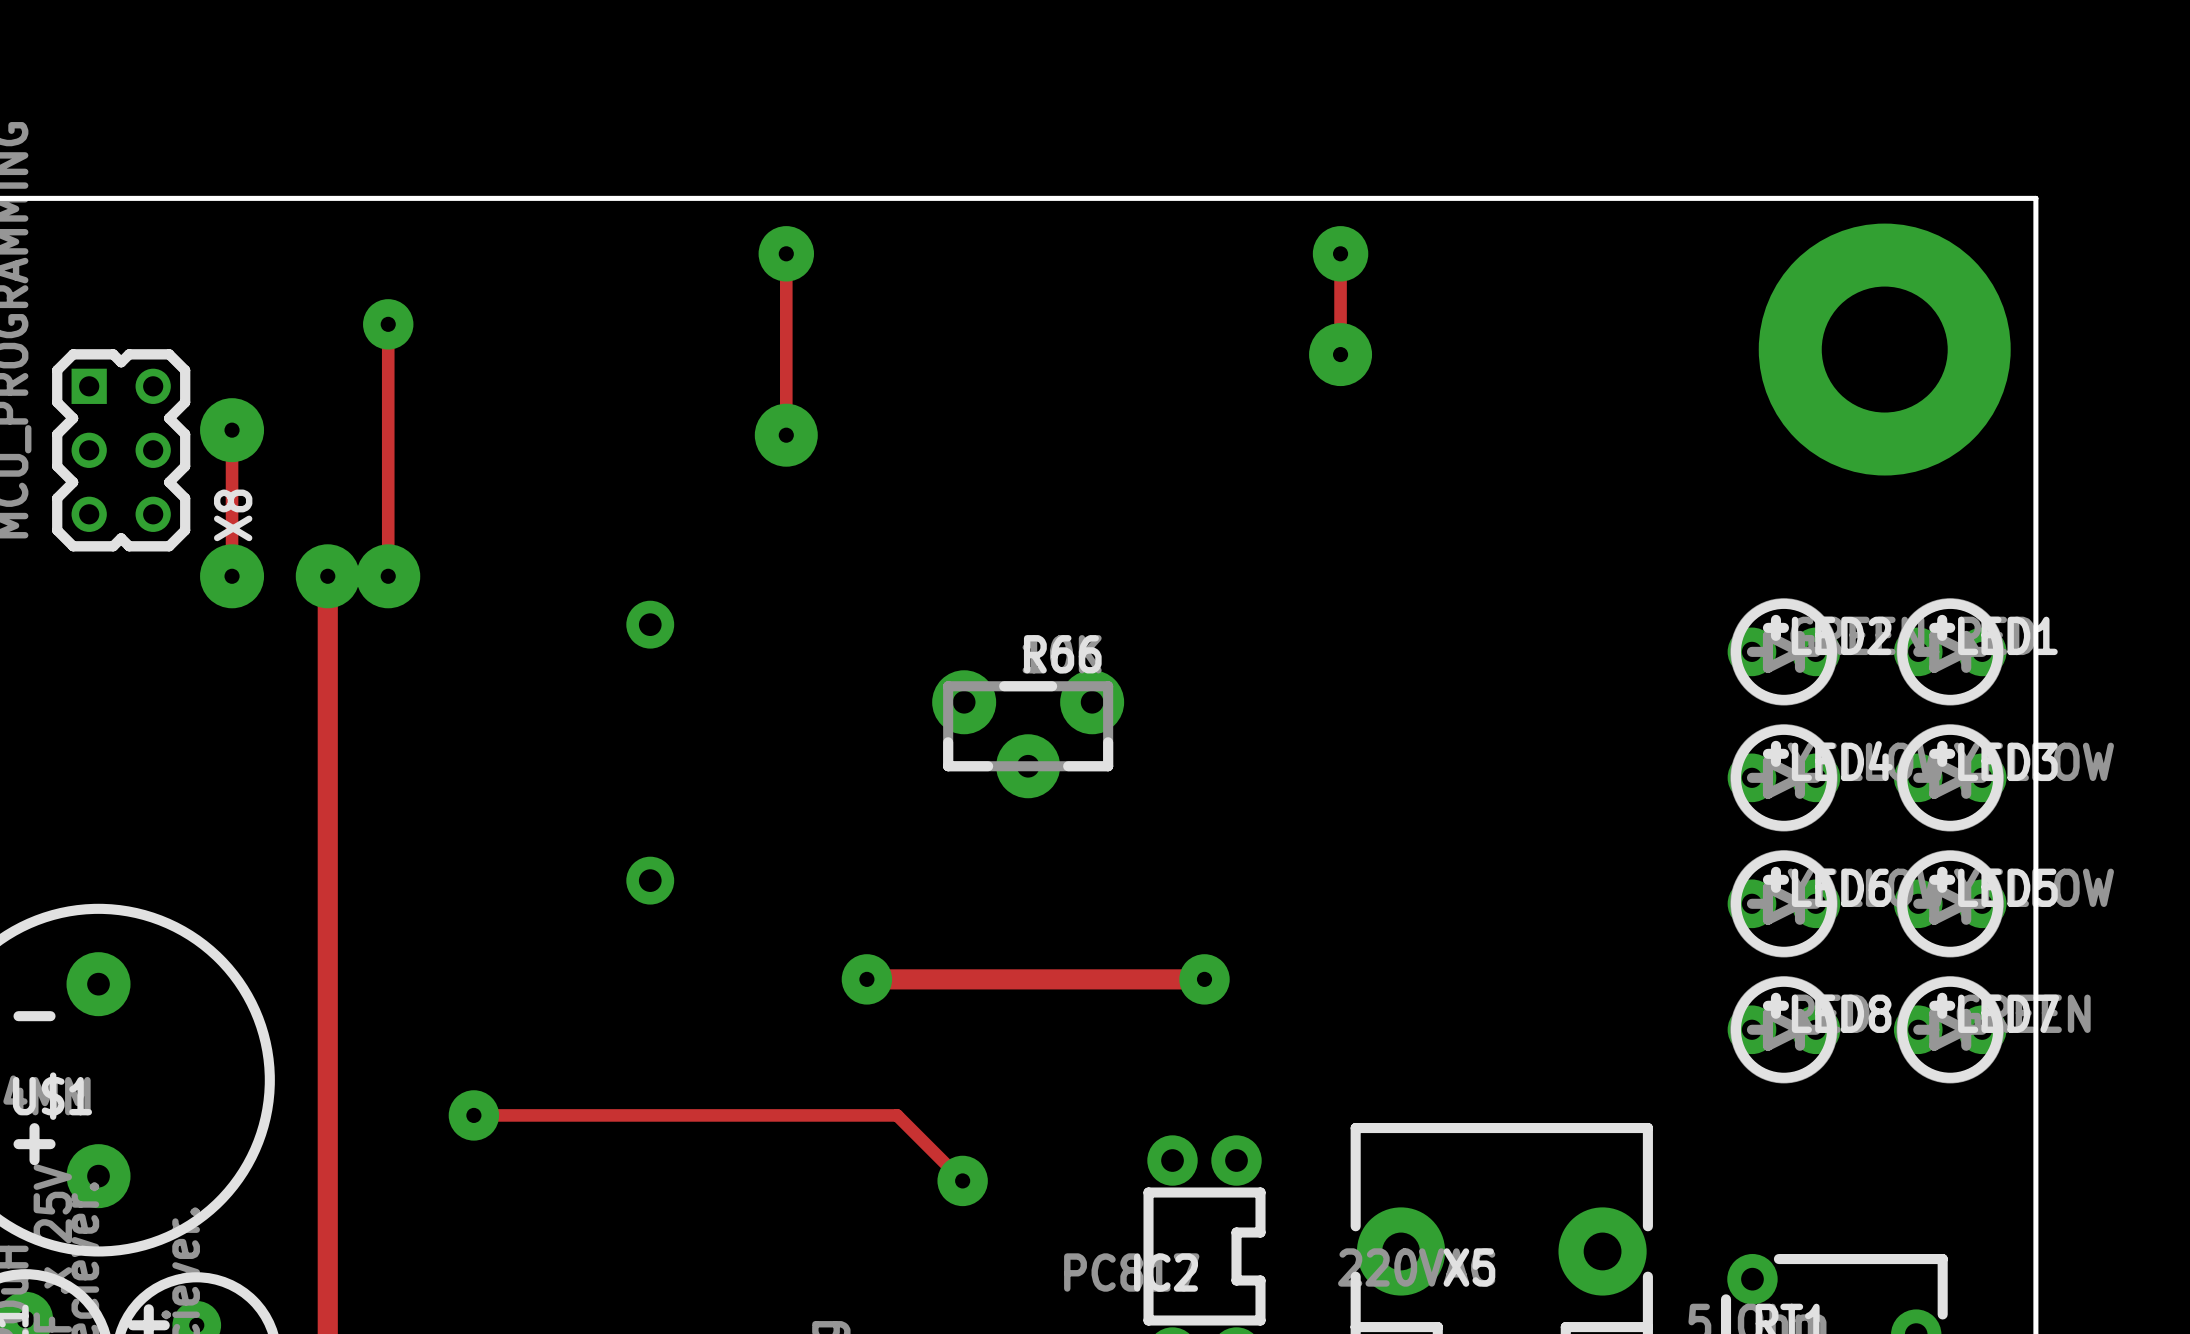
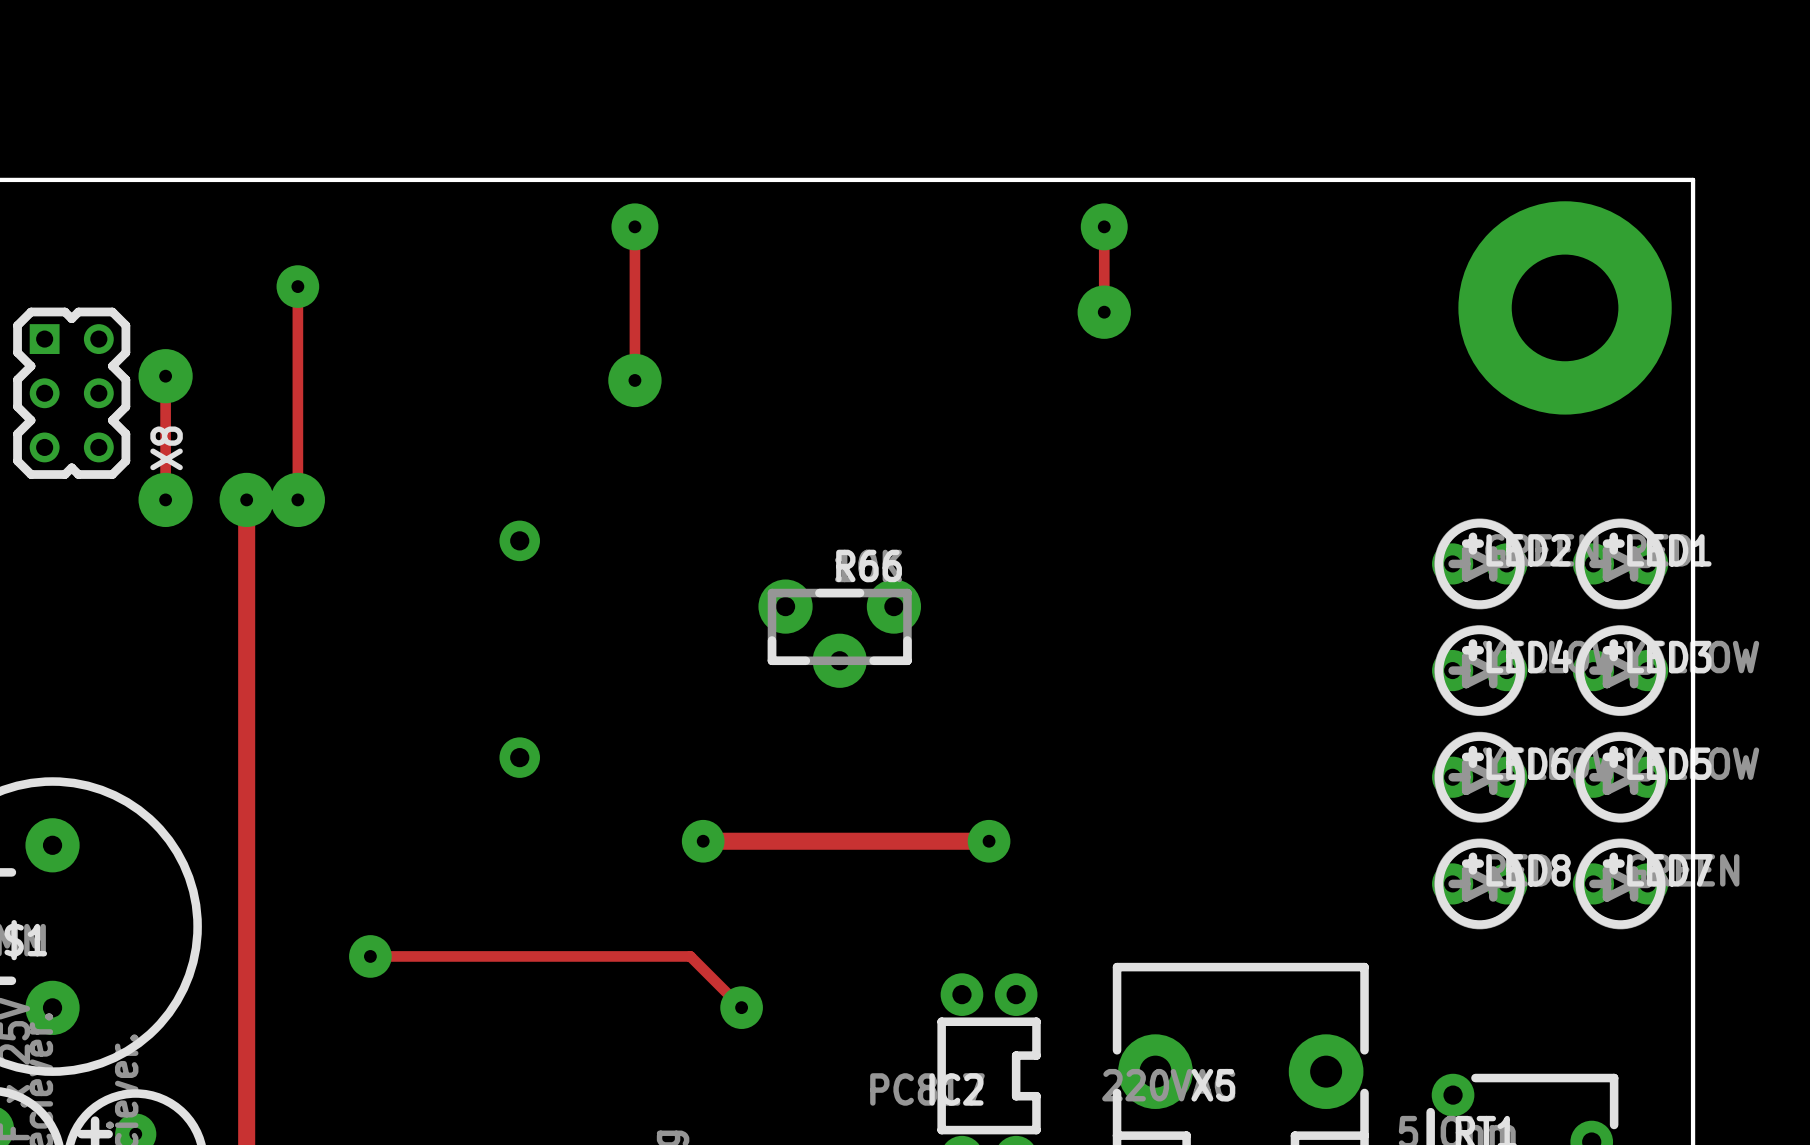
track: (851, 1115) (897, 1115) (962, 1180) -> (690, 956) (741, 1007)
via position: (962, 1180) -> (741, 1007)

